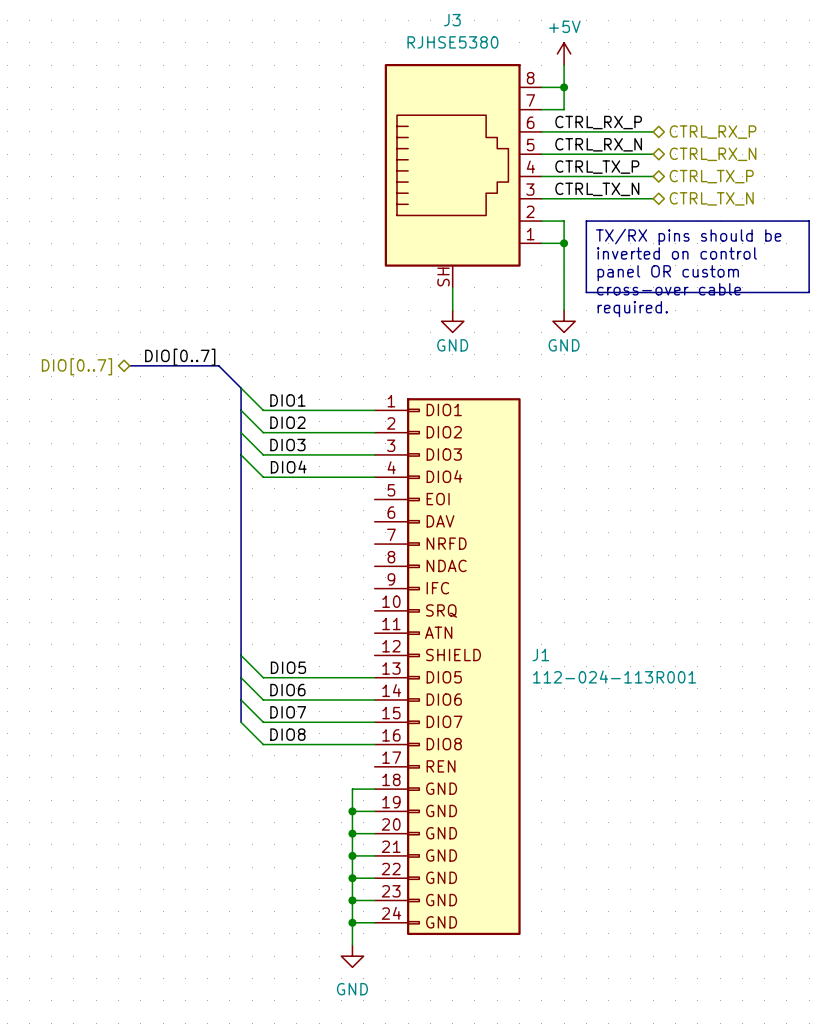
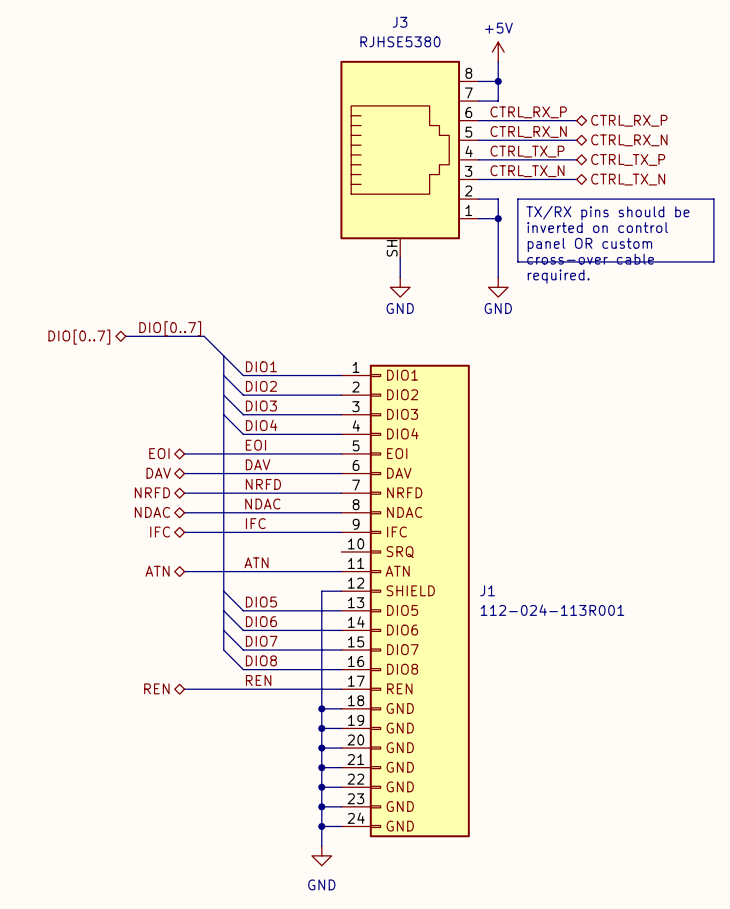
label position: DIO[0..7] (180, 357) -> DIO[0..7] (170, 328)
bus: (129, 365) (218, 365) (229, 376) -> (125, 336) (204, 336)
hierarchical label position: DIO[0..7] (76, 366) -> DIO[0..7] (79, 337)
bus: (241, 388) (241, 722) -> (213, 346) (223, 355) (223, 650)
label position: DIO1 (287, 400) -> DIO1 (261, 366)
wire: (241, 410) (252, 421) -> none
wire: (263, 410) (374, 410) -> (233, 365) (243, 375) (341, 375)
label position: DIO2 (287, 422) -> DIO2 (261, 386)
wire: (241, 432) (252, 443) -> none
wire: (263, 432) (374, 432) -> (233, 385) (243, 395) (341, 395)
label position: DIO3 (287, 445) -> DIO3 (261, 405)
wire: (241, 454) (252, 466) -> none
wire: (263, 454) (374, 454) -> (233, 404) (243, 414) (341, 414)
label position: DIO4 (288, 467) -> DIO4 (261, 425)
wire: (263, 477) (374, 477) -> (233, 424) (243, 434) (341, 434)
label: none -> EOI (255, 445)
hierarchical label: none -> EOI (159, 453)
wire: none -> (184, 453) (341, 453)
label: none -> DAV (258, 464)
hierarchical label: none -> DAV (158, 473)
wire: none -> (184, 473) (341, 473)
label: none -> NRFD (263, 484)
hierarchical label: none -> NRFD (152, 492)
wire: none -> (184, 493) (341, 493)
label: none -> NDAC (262, 504)
hierarchical label: none -> NDAC (152, 512)
wire: none -> (184, 512) (341, 512)
label: none -> IFC (255, 523)
hierarchical label: none -> IFC (160, 532)
wire: none -> (184, 532) (341, 532)
label: none -> ATN (256, 562)
hierarchical label: none -> ATN (157, 571)
wire: none -> (184, 571) (341, 571)
wire: (241, 655) (252, 666) -> none
wire: none -> (341, 591) (321, 591) (321, 846)
J1 position: (447, 666) -> (405, 601)
label position: DIO5 (288, 667) -> DIO5 (261, 602)
wire: (241, 677) (252, 688) -> none
wire: (263, 677) (374, 677) -> (233, 601) (243, 610) (340, 610)
label position: DIO6 (287, 690) -> DIO6 (261, 621)
wire: (241, 700) (252, 711) -> none
wire: (263, 700) (374, 700) -> (233, 620) (243, 630) (341, 630)
label position: DIO7 (288, 712) -> DIO7 (261, 641)
wire: (241, 722) (252, 733) -> none
wire: (263, 722) (374, 722) -> (233, 640) (243, 650) (341, 650)
label position: DIO8 (287, 734) -> DIO8 (261, 660)
wire: (263, 744) (374, 744) -> (233, 659) (243, 669) (341, 669)
label: none -> REN (258, 680)
hierarchical label: none -> REN (156, 688)
wire: none -> (184, 689) (341, 689)
wire: (374, 789) (352, 789) (352, 945) -> none
junction: none -> (321, 708)
wire: (352, 811) (374, 811) -> (321, 708) (341, 708)
junction: (352, 811) -> none
junction: none -> (321, 728)
wire: (352, 833) (374, 833) -> (321, 728) (341, 728)
junction: (352, 833) -> none
junction: none -> (321, 748)
wire: (352, 855) (374, 855) -> (321, 767) (341, 767)
junction: (352, 855) -> none
junction: none -> (321, 767)
wire: (352, 878) (374, 878) -> (321, 748) (341, 748)
junction: (352, 878) -> none
junction: none -> (321, 787)
wire: (352, 900) (374, 900) -> (321, 787) (341, 787)
junction: (352, 900) -> none
wire: none -> (321, 806) (341, 806)
junction: none -> (321, 806)
wire: (352, 922) (374, 922) -> (321, 826) (341, 826)
junction: (352, 922) -> none
junction: none -> (321, 826)
power symbol position: GND (352, 956) -> GND (321, 855)

